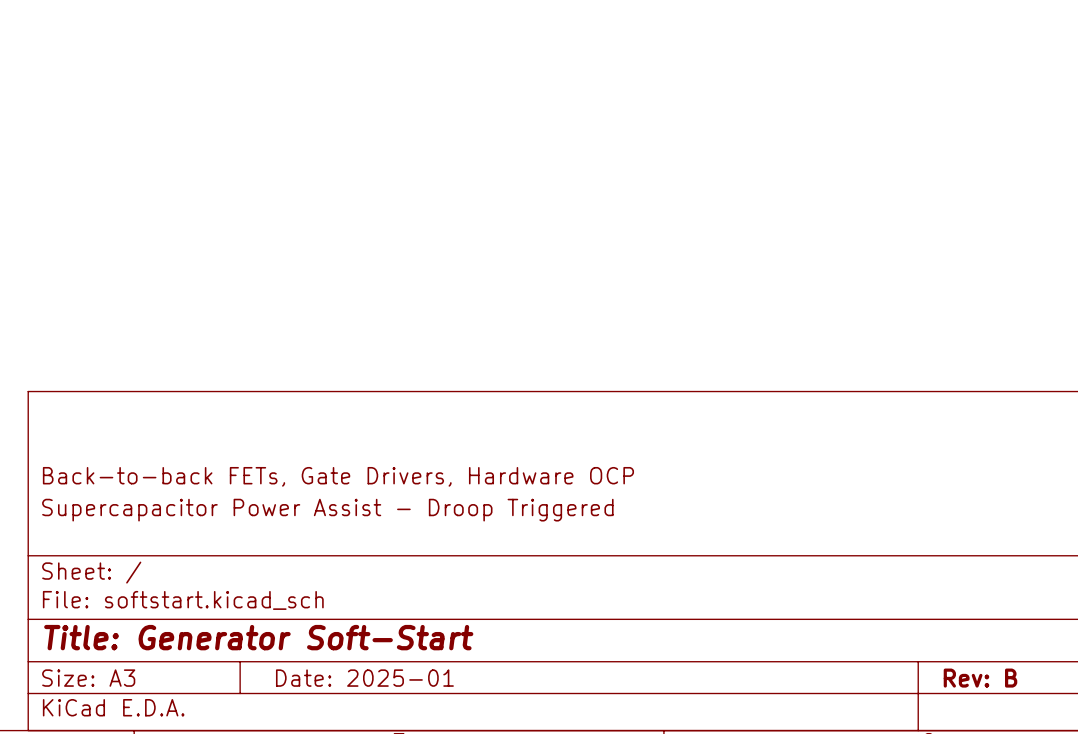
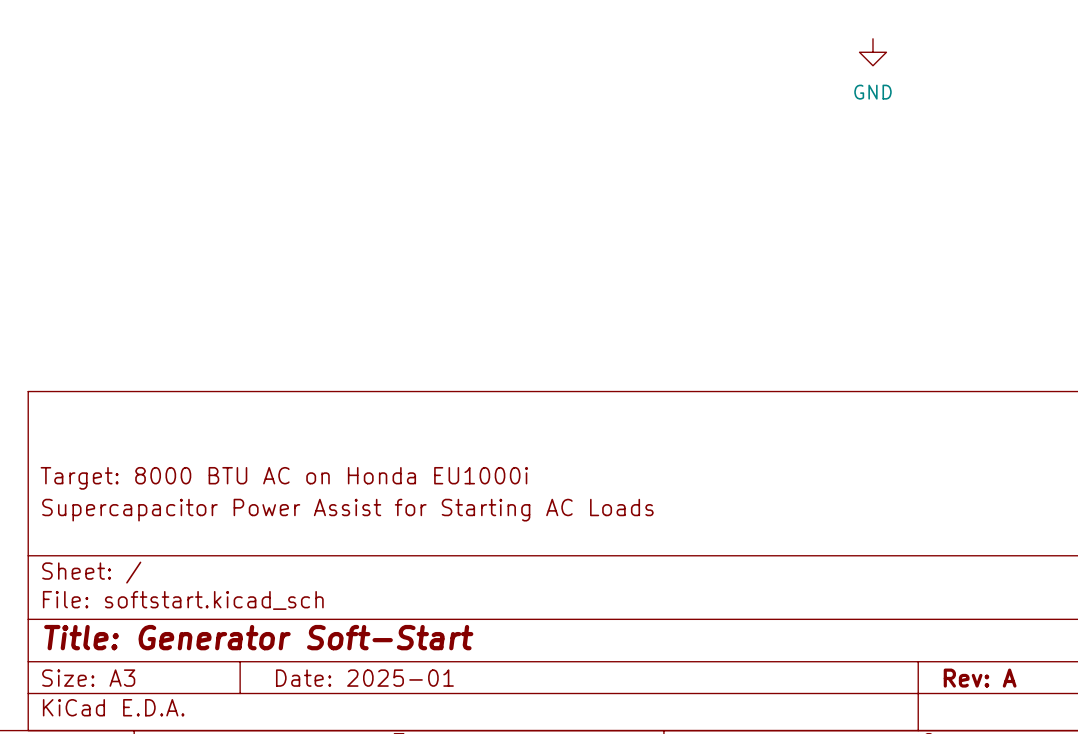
power symbol: none -> GND (872, 52)
title block: Back-to-back FETs, Gate Drivers, Hardware OCP (338, 476) -> Target: 8000 BTU AC on Honda EU1000i (284, 478)
title block: Supercapacitor Power Assist - Droop Triggered (327, 510) -> Supercapacitor Power Assist for Starting AC Loads (347, 510)
title block: Rev: B (980, 678) -> Rev: A (980, 678)

